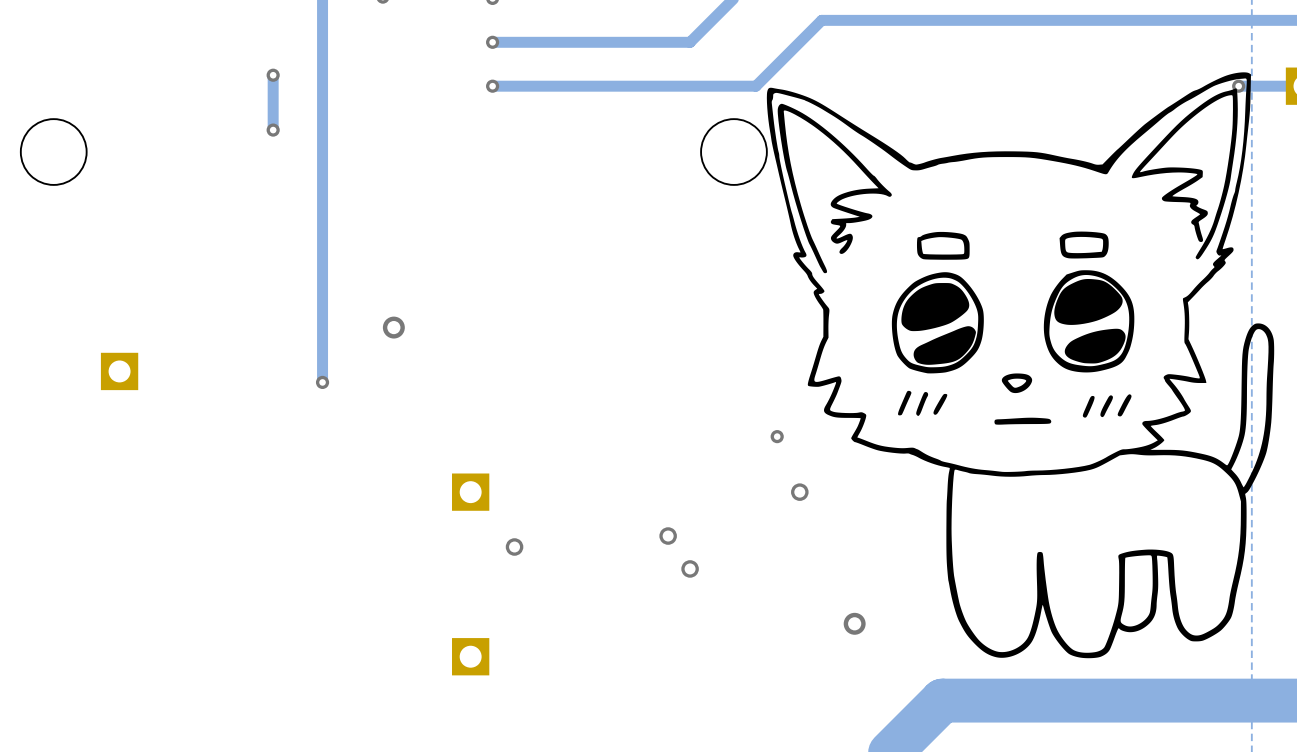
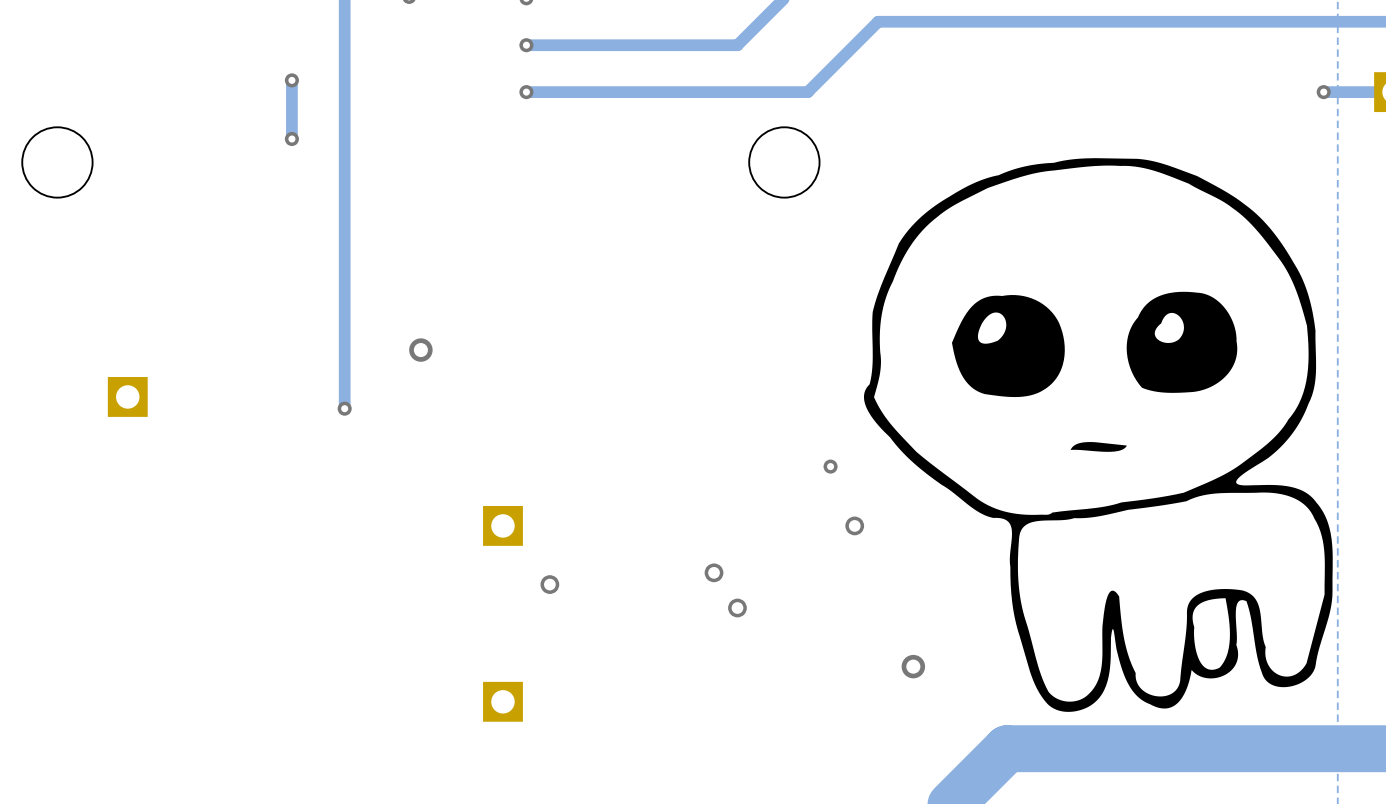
drawing: [766, 72, 1275, 659] -> none
drawing: none -> [863, 158, 1333, 712]
drawing shape: [891, 272, 984, 374] -> [951, 295, 1065, 398]
drawing shape: [994, 417, 1052, 425] -> [1070, 442, 1127, 452]

